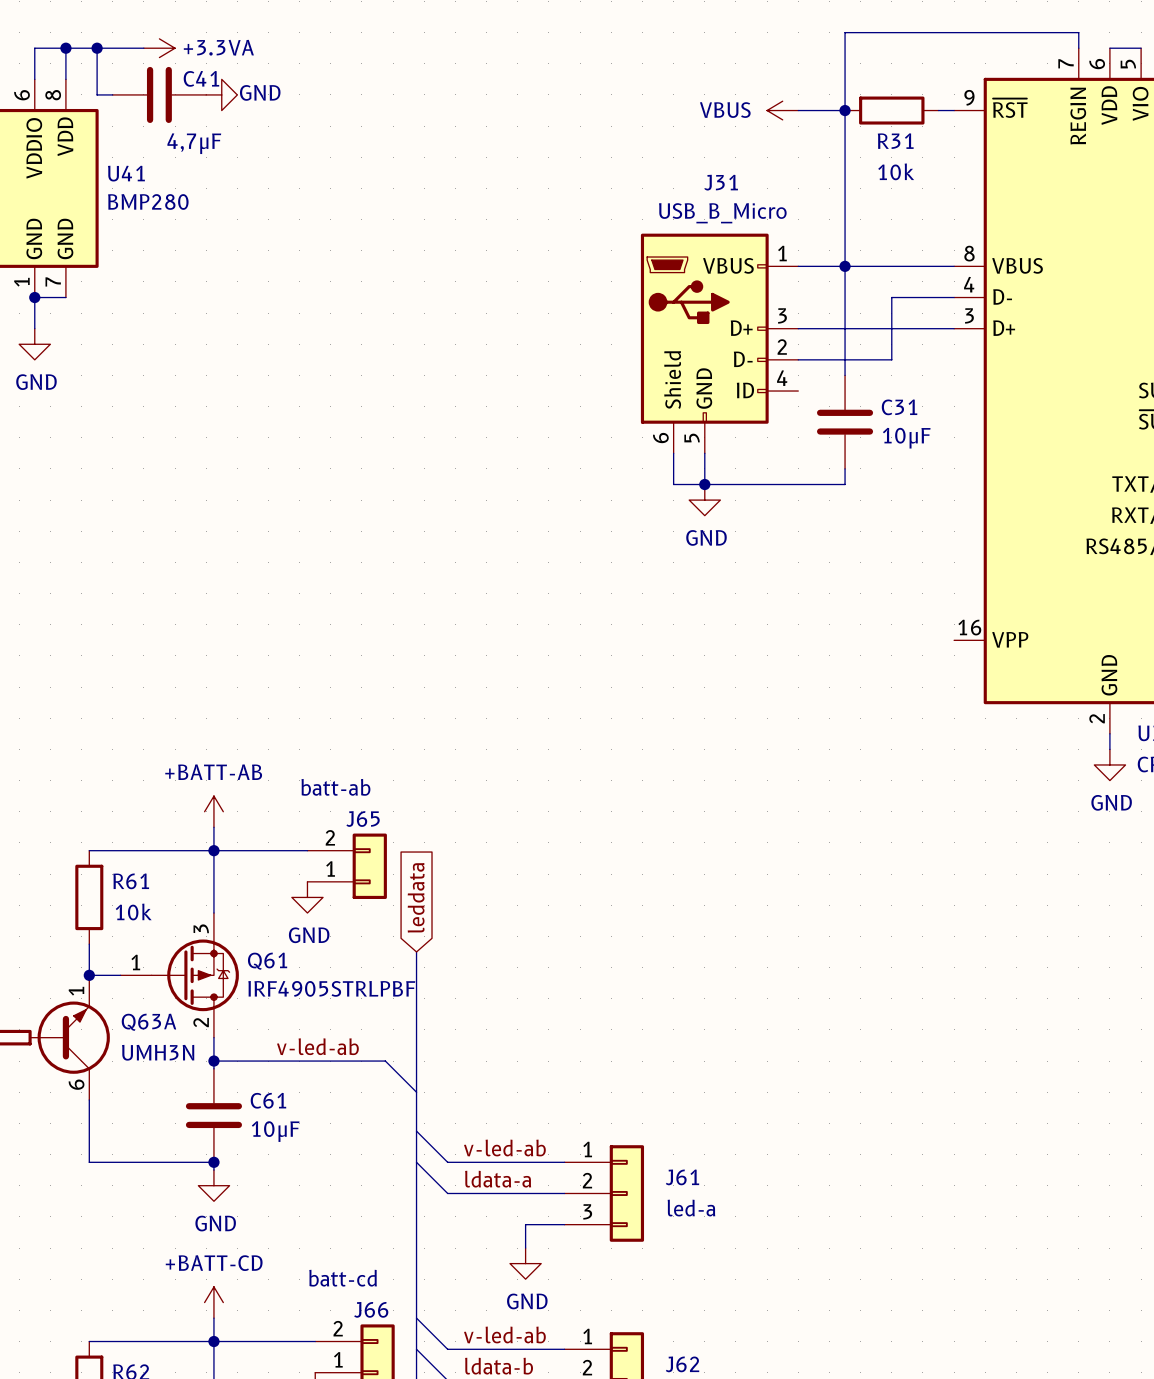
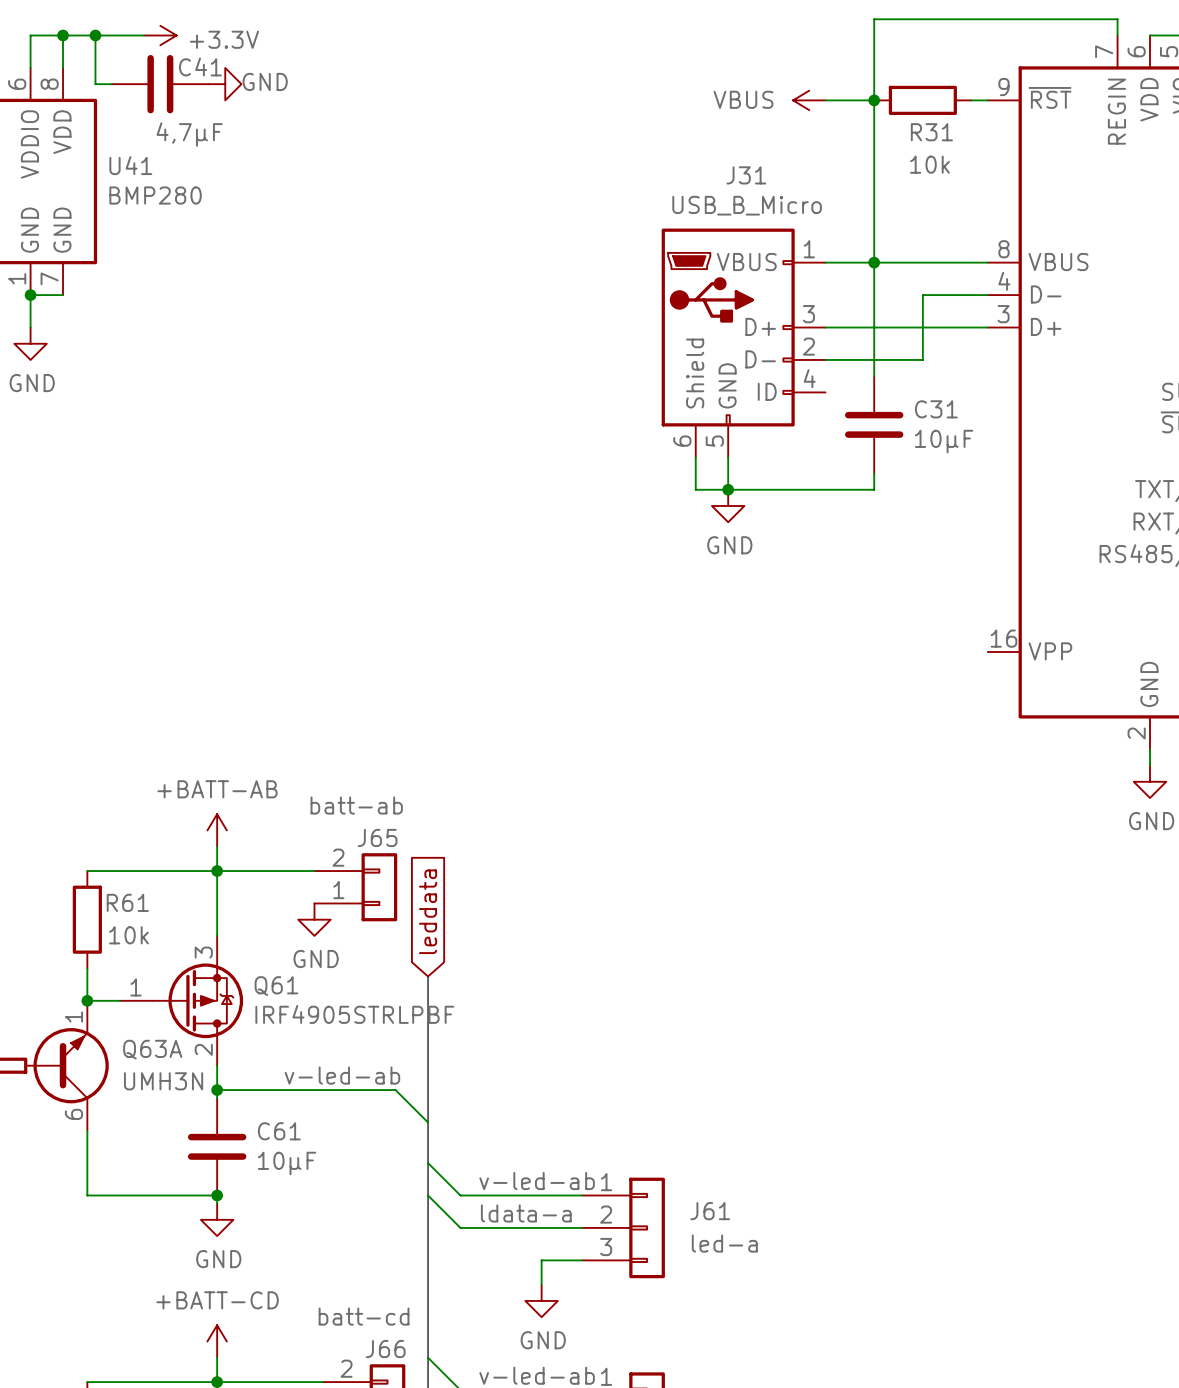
power symbol: +3.3VA (159, 48) -> +3.3V (160, 35)

